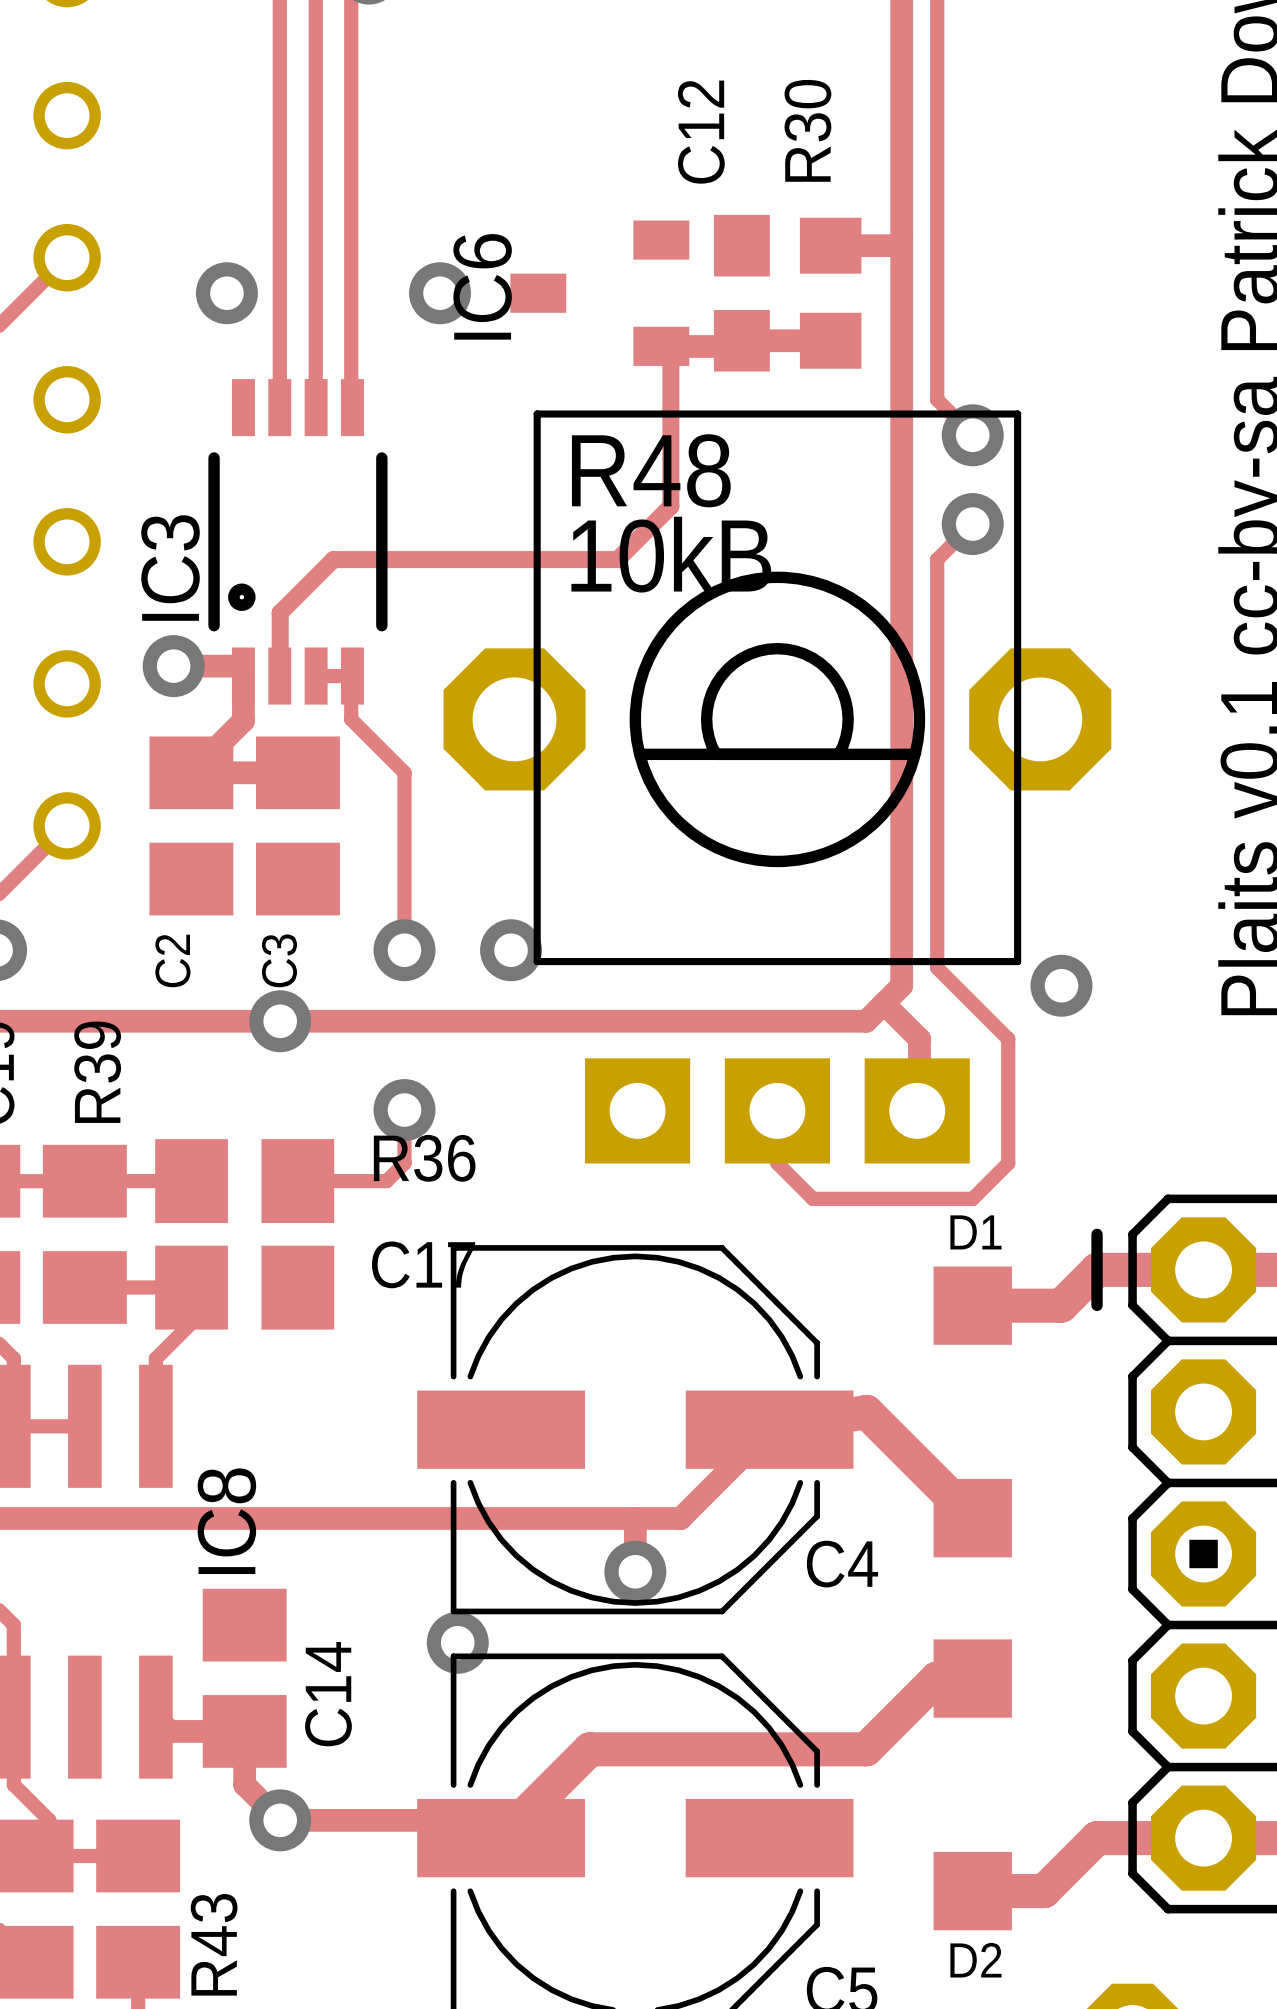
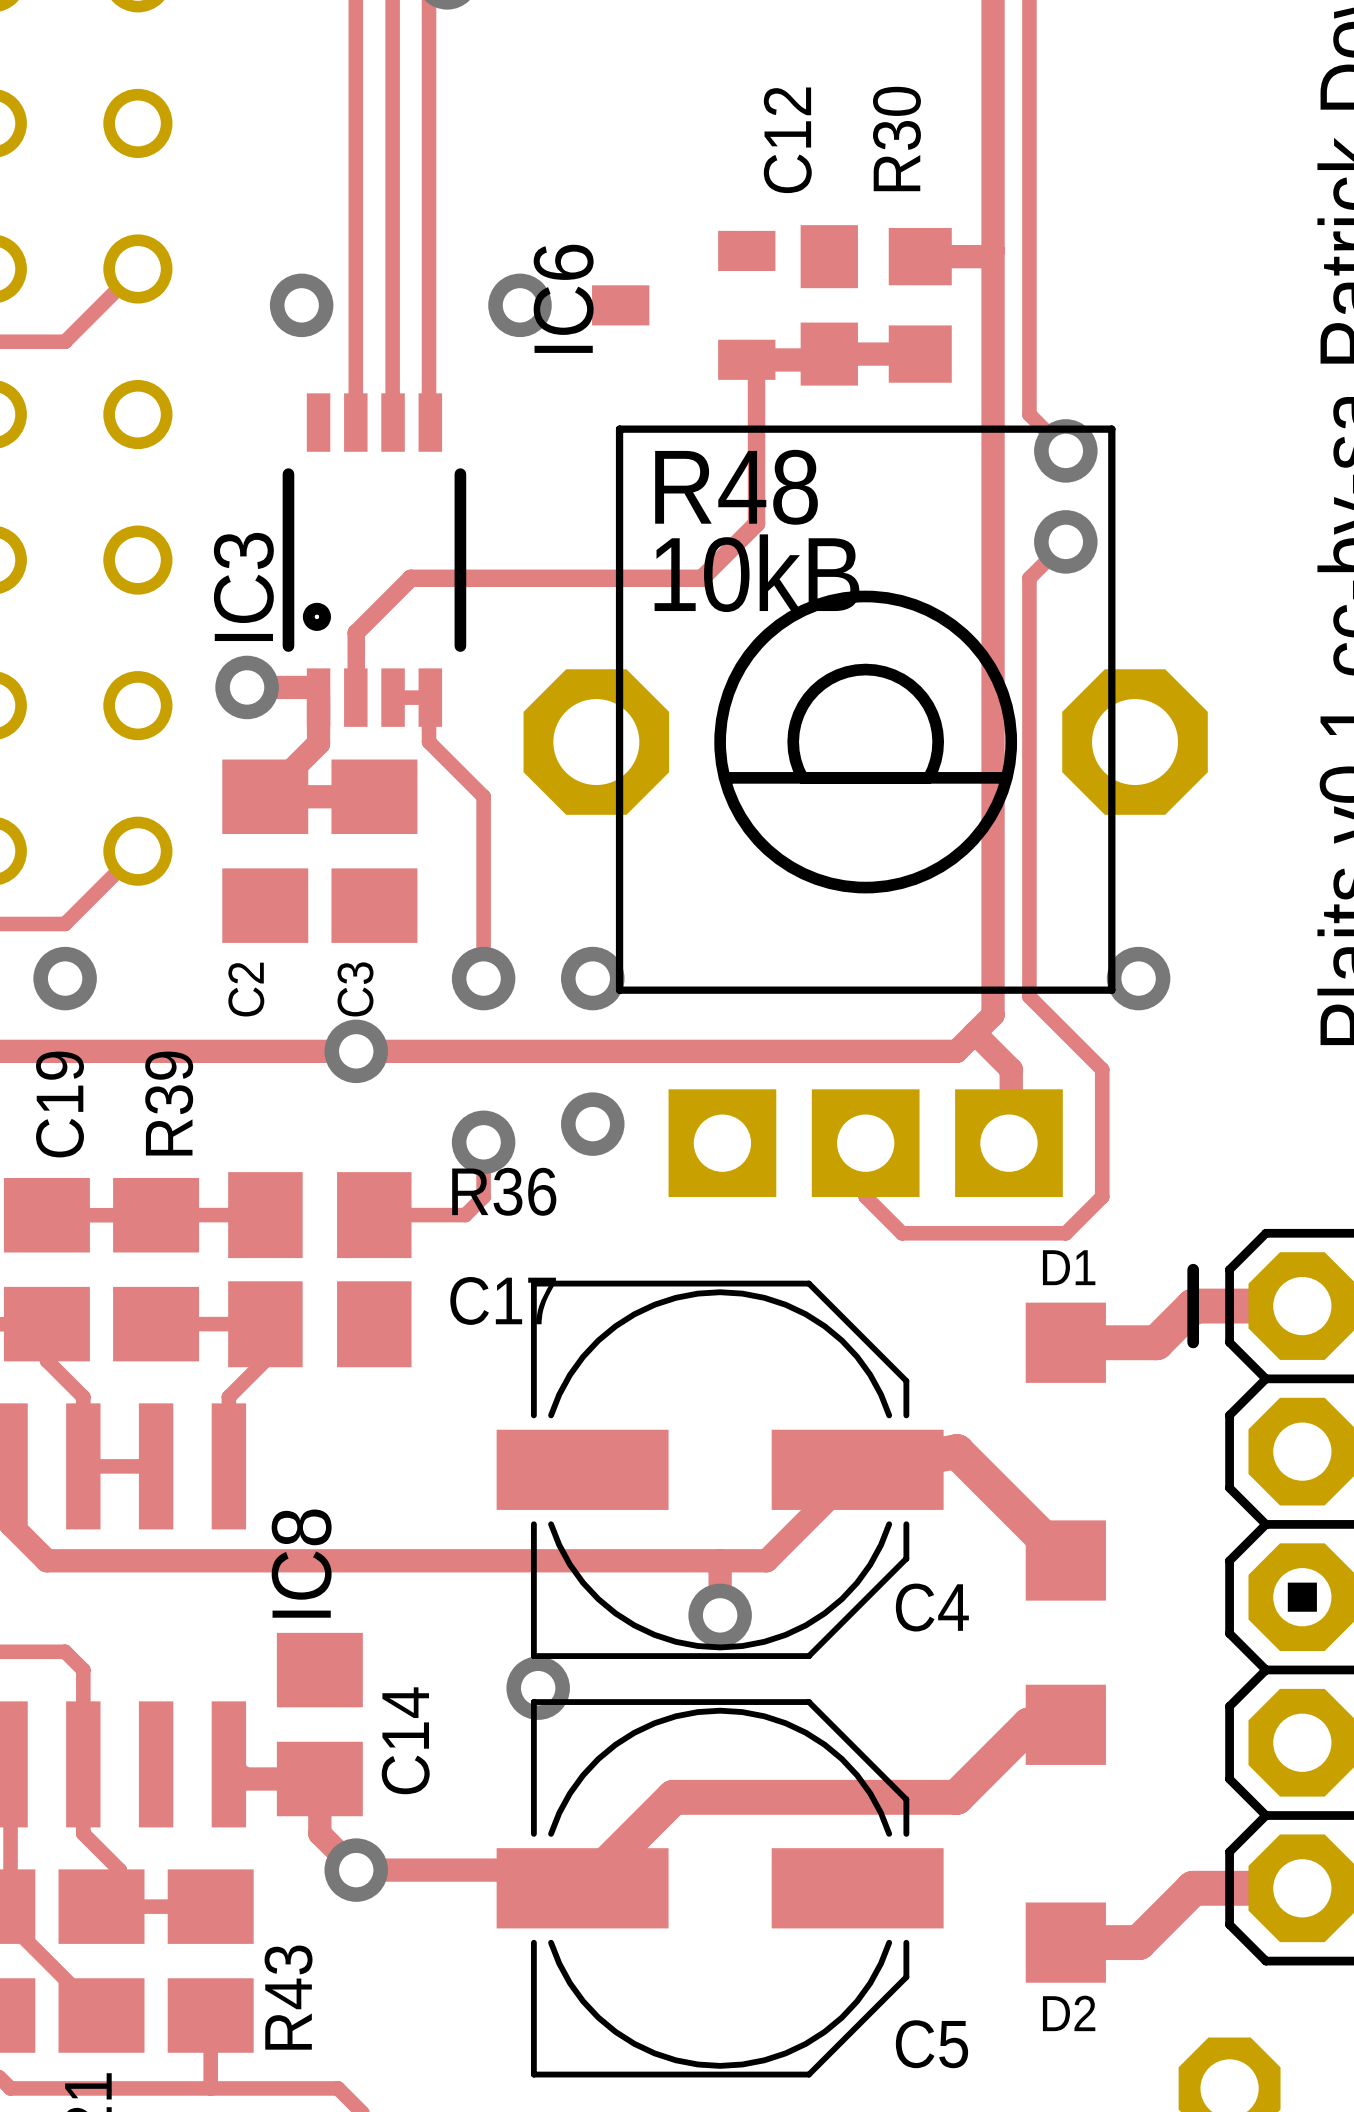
via position: (1061, 985) -> (1138, 978)
via: none -> (592, 1124)

